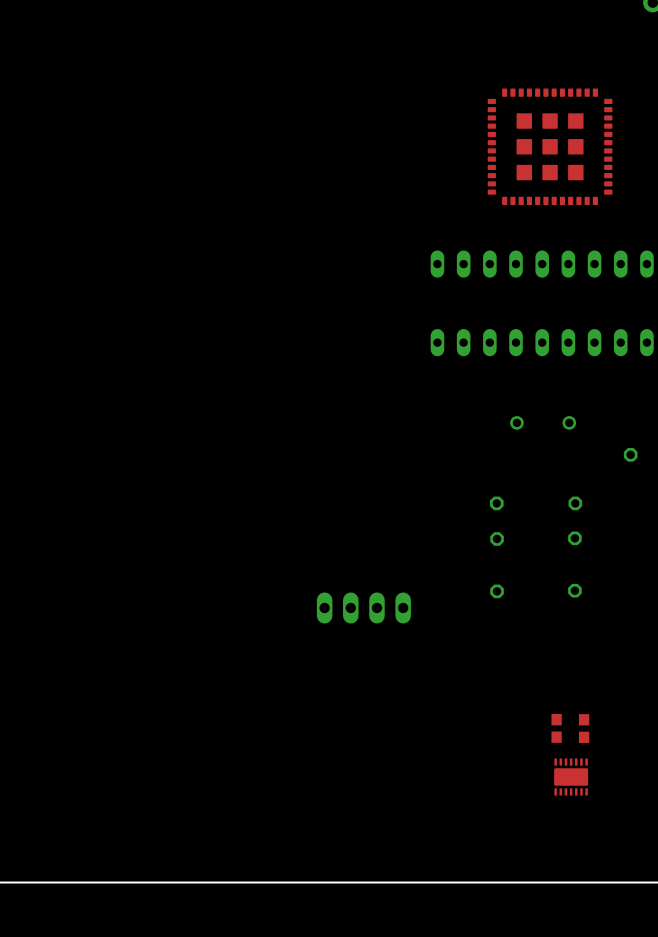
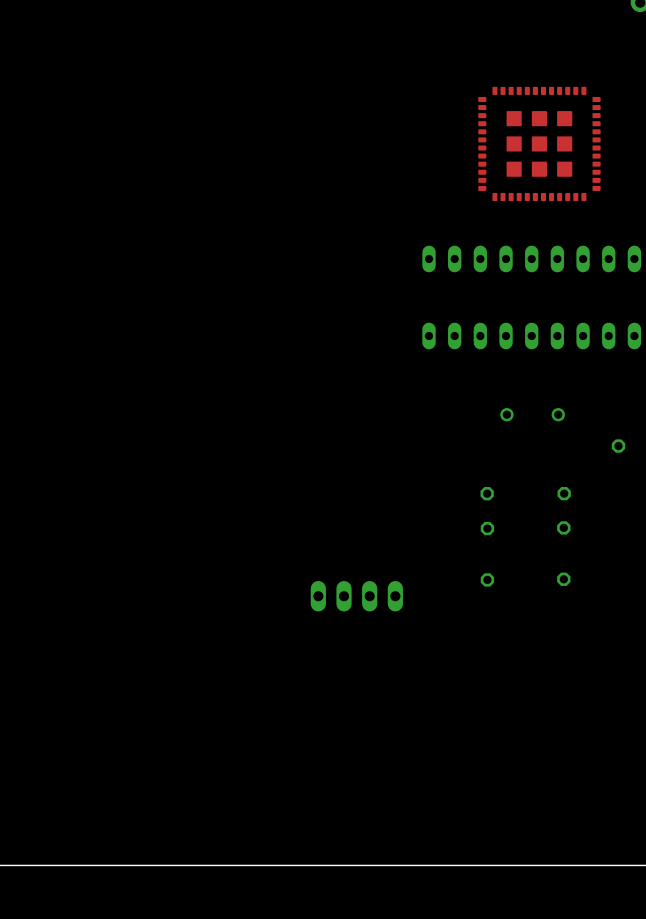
part: (556, 728) -> none
part: (584, 728) -> none
part: (571, 776) -> none

